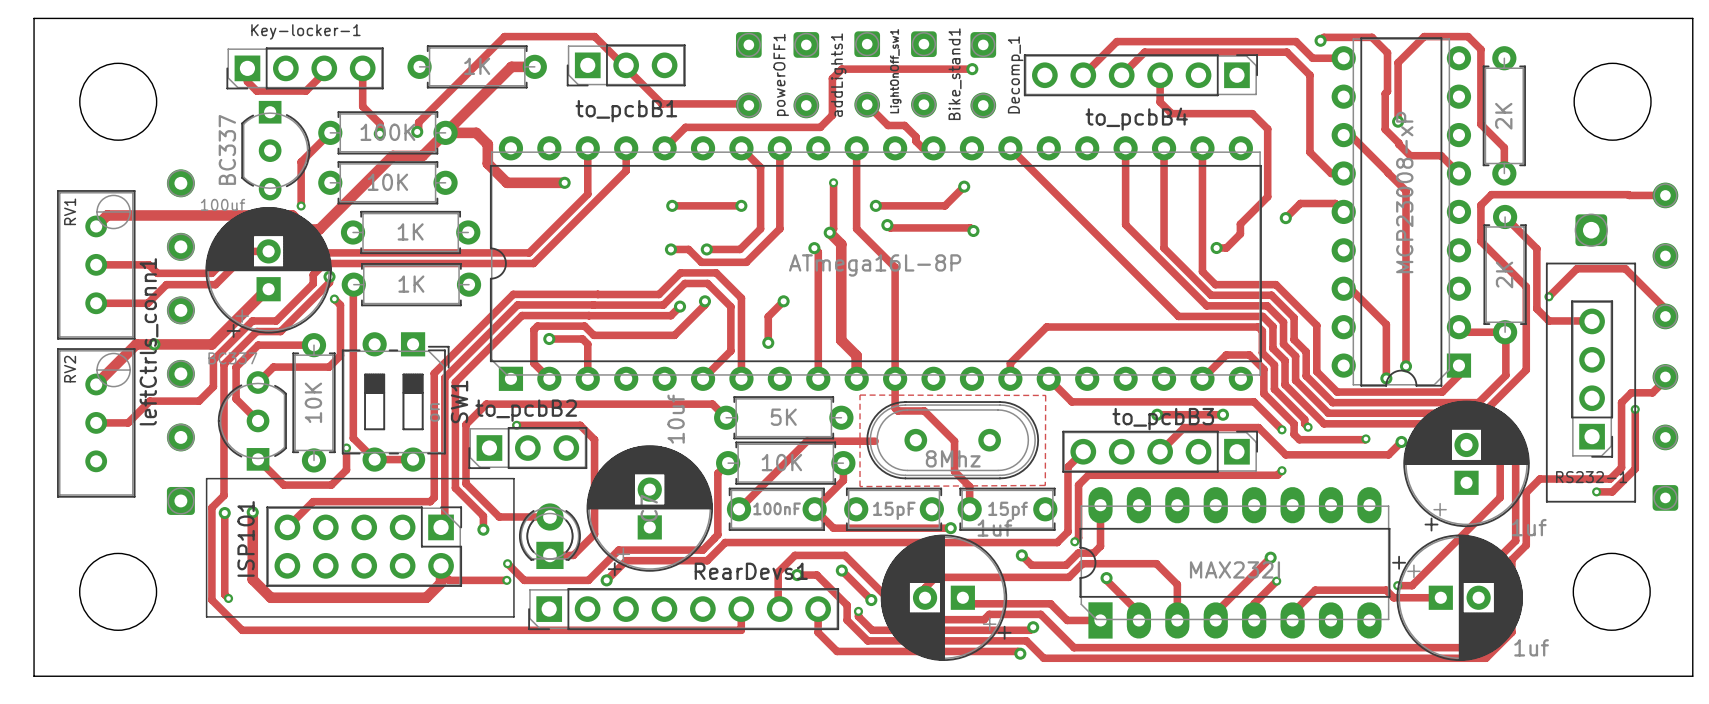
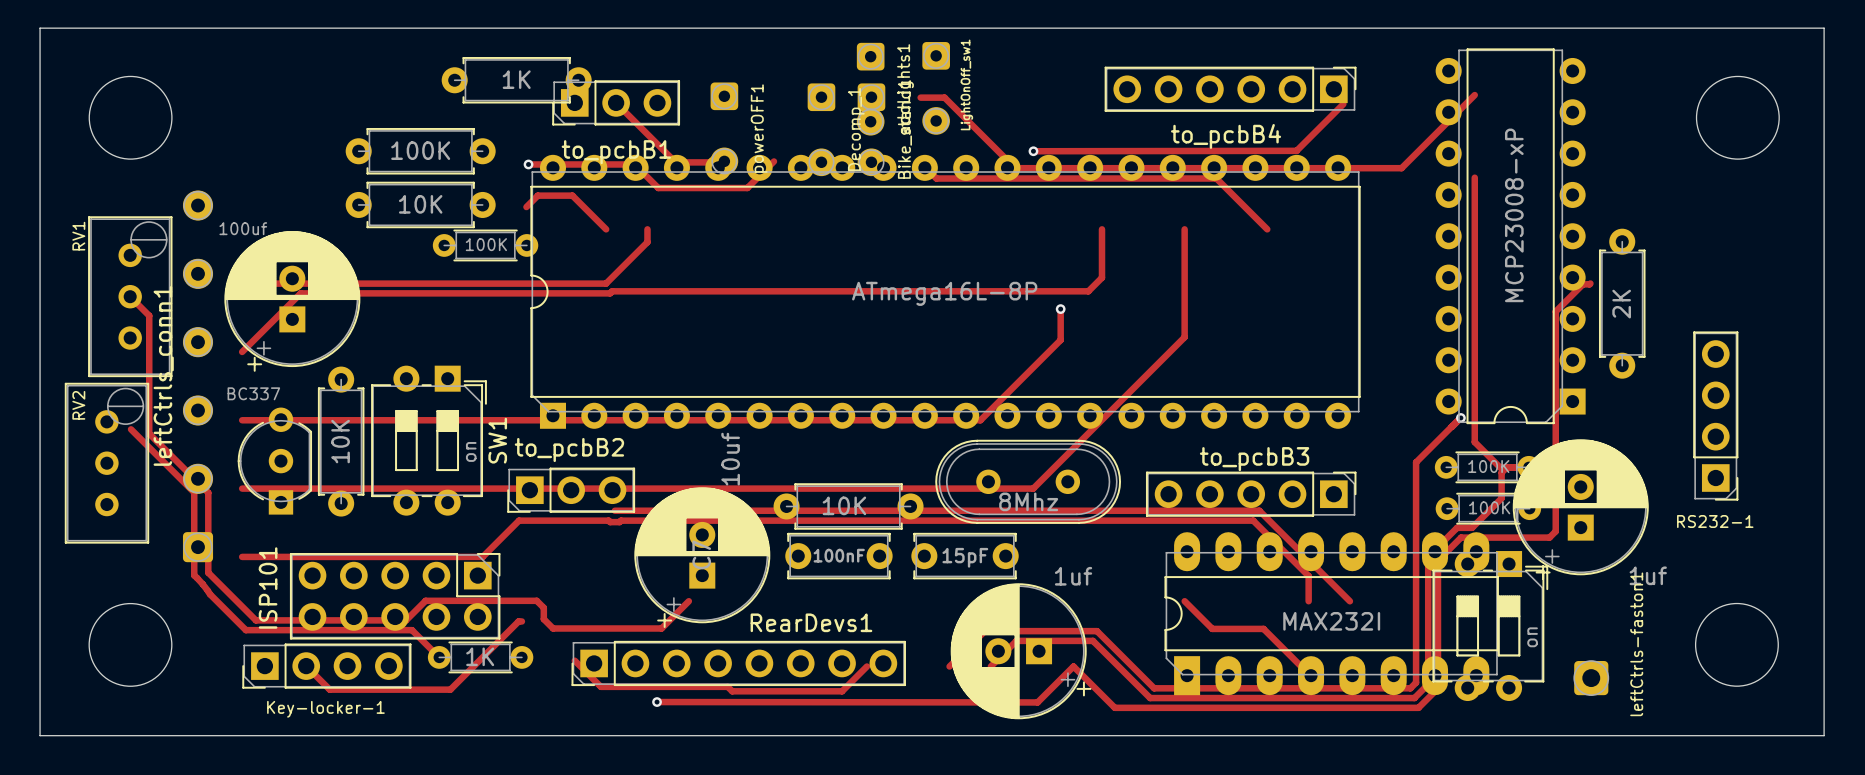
Key-locker-1 name position: Key-locker-1 (305, 31) -> Key-locker-1 (325, 709)
track: (1320, 40) (1323, 37) (1372, 37) (1387, 52) (1385, 129) (1410, 155) (1441, 155) (1458, 173) -> none
via: (1320, 40) -> none
track: (1343, 58) (1312, 58) (1296, 41) (1116, 41) (1083, 75) -> none
to_pcbB1 position: (626, 65) -> (616, 102)
track: (534, 66) (511, 66) (422, 155) (392, 155) (319, 229) (306, 229) (292, 215) (107, 215) (96, 226) -> none
track: (247, 68) (247, 81) (256, 91) (305, 91) (324, 72) (324, 68) -> none
Key-locker-1 position: (305, 68) -> (326, 666)
track: (362, 68) (362, 106) (379, 123) (379, 133) -> none
track: (972, 69) (841, 69) (832, 78) (832, 115) (820, 127) (685, 127) (664, 148) -> none
via: (972, 69) -> none
Bike_stand1 position: (923, 74) -> (871, 129)
powerOFF1 position: (748, 75) -> (724, 128)
Decomp_1 position: (983, 75) -> (821, 129)
track: (1121, 75) (1144, 52) (1286, 52) (1309, 75) (1309, 152) (1331, 173) (1343, 173) -> none
track: (1160, 75) (1160, 102) (1171, 113) (1252, 113) (1267, 129) (1267, 196) (1240, 224) (1240, 234) (1226, 247) (1216, 247) -> none
track: none -> (1474, 95) (1401, 168) (1015, 168) (944, 97) (920, 97)
track: none -> (616, 102) (675, 162) (724, 161)
track: none -> (1343, 104) (1296, 150) (1033, 150)
track: (867, 104) (887, 125) (904, 125) (915, 136) (915, 141) (922, 148) (933, 148) -> none
track: (748, 105) (662, 103) (594, 36) (504, 36) (418, 122) (417, 131) -> none
part: 2K (1504, 115) -> none
track: (1398, 121) (1398, 62) (1424, 36) (1468, 36) (1480, 49) (1480, 124) (1504, 147) (1504, 173) -> none
via: (1398, 121) -> none
via: (417, 131) -> none
track: (330, 132) (301, 162) (301, 206) -> none
track: (445, 132) (476, 132) (487, 144) (487, 163) (507, 182) (564, 182) -> none
via: none -> (1033, 151)
via: (379, 133) -> none
track: (1343, 135) (1350, 135) (1388, 172) -> none
track: none -> (773, 161) (747, 188) (658, 188) (634, 164) (528, 164)
track: none -> (920, 162) (936, 178) (1216, 178) (1267, 229)
via: none -> (528, 164)
track: (587, 148) (587, 194) (529, 252) (312, 252) (287, 227) (257, 227) (211, 273) (157, 273) (148, 264) (96, 264) -> none
track: (626, 148) (626, 170) (533, 263) (324, 263) (313, 274) (313, 283) (276, 320) (252, 320) (213, 360) (213, 386) (199, 401) (149, 401) (128, 422) (96, 422) -> none
track: (741, 148) (760, 167) (760, 228) (740, 249) (706, 249) -> none
track: (779, 148) (779, 228) (746, 262) (701, 262) (688, 249) (670, 249) -> none
track: (856, 148) (856, 228) (895, 267) (895, 408) (897, 410) (924, 410) (954, 441) (954, 471) (969, 486) (969, 509) -> none
track: (1010, 148) (1178, 316) (1262, 316) (1272, 326) (1272, 348) (1285, 360) (1285, 384) (1324, 423) (1501, 423) (1515, 438) (1515, 540) (1501, 555) (1501, 628) (1481, 647) (1074, 647) (1040, 614) (989, 614) (984, 619) (909, 619) (844, 555) (794, 555) (778, 572) (779, 609) -> none
track: (1125, 148) (1125, 224) (1206, 305) (1267, 305) (1283, 322) (1283, 344) (1295, 356) (1295, 380) (1328, 413) (1483, 413) (1526, 369) (1526, 286) (1480, 241) (1480, 205) (1491, 194) (1665, 195) -> none
track: (1164, 148) (1164, 248) (1211, 295) (1271, 295) (1294, 317) (1294, 339) (1306, 351) (1306, 376) (1332, 402) (1478, 402) (1505, 375) (1505, 332) (1464, 332) (1458, 327) -> none
track: (1202, 148) (1202, 271) (1215, 284) (1275, 284) (1316, 325) (1316, 371) (1337, 392) (1442, 392) (1458, 375) (1458, 365) -> none
part: BC337 (275, 150) -> none
track: none -> (1474, 177) (1474, 442) (1499, 467) (1528, 467)
track: (1388, 173) (1406, 190) (1406, 366) -> none
via: (564, 182) -> none
track: (833, 182) (833, 228) (829, 232) (841, 244) (841, 340) (856, 355) (856, 378) -> none
via: (833, 182) -> none
track: none -> (526, 207) (537, 195) (572, 195) (606, 229)
track: (964, 186) (944, 205) (875, 205) -> none
via: (964, 186) -> none
track: none -> (647, 229) (647, 242) (606, 283) (242, 283)
track: (672, 205) (741, 205) -> none
via: (672, 205) -> none
via: (741, 205) -> none
via: (875, 205) -> none
track: none -> (1102, 229) (1102, 277) (1088, 291) (300, 293) (242, 351)
track: none -> (1184, 229) (1184, 337) (1033, 488) (242, 488)
via: (301, 206) -> none
track: (1343, 211) (1335, 203) (1300, 203) (1285, 218) -> none
track: (1505, 216) (1536, 248) (1536, 308) (1548, 320) (1592, 321) -> none
via: (1285, 218) -> none
part: none -> 100K (485, 245)
track: (887, 225) (890, 227) (970, 227) (973, 230) -> none
via: (887, 225) -> none
via: (973, 230) -> none
part: (1591, 230) -> none
part: 1K (410, 232) -> none
via: (829, 232) -> none
via: (1216, 247) -> none
track: (814, 248) (818, 252) (818, 378) -> none
via: (814, 248) -> none
via: (670, 249) -> none
via: (706, 249) -> none
track: (268, 251) (248, 251) (215, 284) (166, 284) (147, 303) (96, 303) -> none
track: none -> (1590, 283) (1582, 284) (1555, 311) (1555, 531) (1549, 537) (1461, 537) (1437, 560) (1437, 688) (1418, 707) (1114, 707) (1073, 666) (1037, 702) (656, 702)
line: (1546, 263) (1635, 263) (1635, 501) (1546, 501) (1546, 263) -> none
RV1 position: (96, 264) -> (130, 296)
track: none -> (130, 296) (149, 315) (149, 433) (208, 492) (208, 572) (255, 620) (406, 620) (425, 600) (536, 600) (543, 607) (543, 619) (553, 628) (661, 628) (688, 601)
track: (329, 276) (329, 282) (280, 331) (256, 331) (224, 364) (224, 495) (211, 507) (211, 600) (242, 630) (741, 630) (741, 609) -> none
via: (329, 276) -> none
track: none -> (1060, 309) (1060, 340) (980, 420) (242, 420)
via: none -> (1060, 309)
track: (353, 281) (353, 438) (374, 459) (413, 459) -> none
part: 1K (411, 284) -> none
track: (1343, 288) (1350, 288) (1386, 324) (1386, 378) -> none
track: (268, 289) (211, 344) (136, 344) (96, 384) -> none
track: (597, 294) (513, 294) (434, 373) (434, 497) (430, 501) (313, 501) (287, 527) -> none
track: (597, 294) (658, 294) (680, 272) (716, 272) (741, 298) (741, 378) -> none
track: (1548, 296) (1576, 268) (1625, 268) (1665, 308) (1665, 316) -> none
via: (1548, 296) -> none
track: (334, 299) (340, 305) (340, 355) (329, 367) (273, 367) (258, 382) -> none
via: (334, 299) -> none
track: (704, 301) (704, 304) (674, 335) (593, 335) (584, 326) (537, 326) (533, 329) (533, 363) (549, 378) -> none
via: (704, 301) -> none
track: (783, 301) (768, 316) (768, 342) -> none
via: (783, 301) -> none
track: (593, 304) (517, 304) (444, 377) (444, 523) (441, 527) -> none
track: (593, 305) (663, 305) (684, 283) (707, 283) (730, 306) (730, 350) (703, 378) -> none
track: (680, 306) (670, 315) (589, 315) -> none
via: (680, 306) -> none
track: (589, 315) (522, 315) (455, 382) (455, 488) (483, 516) (483, 529) -> none
track: (549, 338) (582, 338) (587, 344) (587, 378) -> none
via: (549, 338) -> none
via: (768, 342) -> none
via: (154, 344) -> none
track: (314, 345) (258, 345) (236, 367) (236, 399) (258, 420) -> none
part: (1665, 346) -> none
via: (1406, 366) -> none
track: (1016, 378) (1010, 378) (1010, 363) (1046, 327) (1258, 327) (1262, 330) (1262, 352) (1274, 364) (1274, 389) (1304, 419) (1304, 423) (1308, 427) -> none
track: (1048, 378) (1071, 401) (1254, 401) (1282, 429) -> none
track: (1202, 378) (1226, 355) (1249, 355) (1263, 369) (1263, 393) (1294, 423) (1294, 434) (1299, 439) (1365, 438) -> none
via: (1386, 378) -> none
via: none -> (1460, 417)
track: (1663, 381) (1652, 392) (1631, 392) (1621, 402) (1621, 467) (1610, 479) (1539, 479) (1526, 492) (1526, 545) (1511, 559) (1511, 632) (1486, 658) (1043, 658) (1026, 640) (867, 640) (847, 620) (847, 605) (816, 575) (797, 575) -> none
track: none -> (1451, 426) (1452, 426) (1460, 417) (1460, 417) (1416, 462) (1416, 682) (1410, 688) (1154, 688) (1097, 631) (984, 631) (949, 666)
track: none -> (131, 429) (194, 492) (194, 575) (245, 630) (412, 630) (439, 657)
zone outline: (860, 395) (1045, 395) (1045, 485) (860, 486) (860, 395) -> none
track: (1635, 409) (1635, 468) (1612, 491) (1596, 491) -> none
via: (1635, 409) -> none
track: (1157, 414) (1223, 414) -> none
via: (1157, 414) -> none
via: (1223, 414) -> none
track: (726, 417) (712, 404) (486, 404) (466, 424) (466, 483) (499, 516) (549, 516) -> none
part: 5K (783, 417) -> none
track: (515, 425) (580, 425) (594, 439) (594, 534) (573, 555) (549, 555) -> none
via: (516, 425) -> none
part: none -> 100K (1487, 467)
track: none -> (1506, 467) (1501, 472) (1501, 498) (1472, 527) (1457, 527) (1428, 556) (1428, 684) (1414, 698) (1150, 698) (1092, 640) (1016, 640) (990, 666)
via: (1308, 427) -> none
via: (1282, 429) -> none
via: (1365, 438) -> none
track: (875, 441) (807, 441) (739, 509) -> none
track: (1401, 441) (1388, 454) (1285, 454) (1258, 427) (1184, 427) (1160, 451) (1160, 443) -> none
via: (1401, 441) -> none
track: (1500, 442) (1500, 497) (1412, 585) (1397, 585) -> none
track: (346, 448) (346, 469) (331, 485) (283, 485) (258, 459) -> none
via: (346, 448) -> none
track: (1083, 451) (1067, 467) (1067, 531) (1057, 542) (725, 542) -> none
track: (728, 463) (717, 473) (717, 534) (714, 538) -> none
track: (843, 463) (843, 480) (814, 509) (833, 528) (950, 528) -> none
part: none -> 100K (1488, 508)
track: none -> (614, 510) (1259, 510) (1349, 601)
track: (1282, 470) (1277, 475) (1088, 475) (1078, 485) (1078, 538) (1074, 541) -> none
via: (1282, 470) -> none
line: (206, 478) (513, 478) (513, 616) (206, 616) (206, 478) -> none
via: (1596, 491) -> none
track: (1100, 505) (1100, 546) (1093, 553) (1078, 553) (1066, 565) (1031, 565) (1021, 555) -> none
part: 15pf (1007, 509) -> none
track: none -> (242, 556) (482, 556) (519, 520) (1253, 520) (1308, 576) (1308, 601)
track: (252, 512) (252, 579) (270, 597) (426, 597) (441, 583) (441, 565) (441, 571) (449, 580) (506, 580) -> none
via: (252, 512) -> none
track: (224, 513) (224, 594) (228, 598) -> none
via: (224, 513) -> none
via: (950, 528) -> none
via: (483, 529) -> none
part: (549, 536) -> none
track: (714, 538) (702, 550) (618, 550) (588, 580) (524, 580) (507, 563) -> none
via: (1074, 541) -> none
track: (725, 542) (707, 560) (626, 560) (606, 580) -> none
track: none -> (1184, 601) (1212, 628) (1263, 628) (1300, 666)
via: (1021, 555) -> none
track: (1270, 557) (1215, 612) (1215, 620) -> none
via: (1270, 557) -> none
via: (507, 563) -> none
track: none -> (521, 621) (518, 621) (450, 689) (329, 689) (306, 666)
track: (841, 570) (871, 600) -> none
via: (841, 570) -> none
part: none -> (1490, 626)
via: (797, 575) -> none
track: (1106, 578) (1106, 580) (1138, 612) (1138, 620) -> none
via: (1106, 578) -> none
via: (506, 580) -> none
via: (606, 580) -> none
track: (1276, 581) (1254, 603) (1254, 620) -> none
via: (1276, 581) -> none
via: (1397, 585) -> none
track: (925, 597) (925, 587) (935, 577) (1069, 577) (1082, 563) (1156, 563) (1177, 584) (1177, 620) -> none
track: (962, 597) (968, 603) (1050, 603) (1067, 620) (1100, 620) -> none
track: (1440, 597) (1393, 597) (1386, 590) (1315, 590) (1292, 612) (1292, 620) -> none
part: 1uf (1457, 597) -> none
via: (228, 598) -> none
via: (871, 600) -> none
part: none -> 1K (480, 657)
track: none -> (574, 660) (600, 686) (727, 686) (732, 691) (842, 691) (866, 666)
track: (818, 609) (818, 632) (837, 651) (1018, 651) (1020, 653) -> none
track: (858, 611) (858, 616) (872, 630) (1030, 630) (1033, 627) -> none
via: (858, 611) -> none
leftCtrls-faston1: none -> (1591, 678)
via: (1033, 627) -> none
via: none -> (657, 702)
via: (1020, 653) -> none

